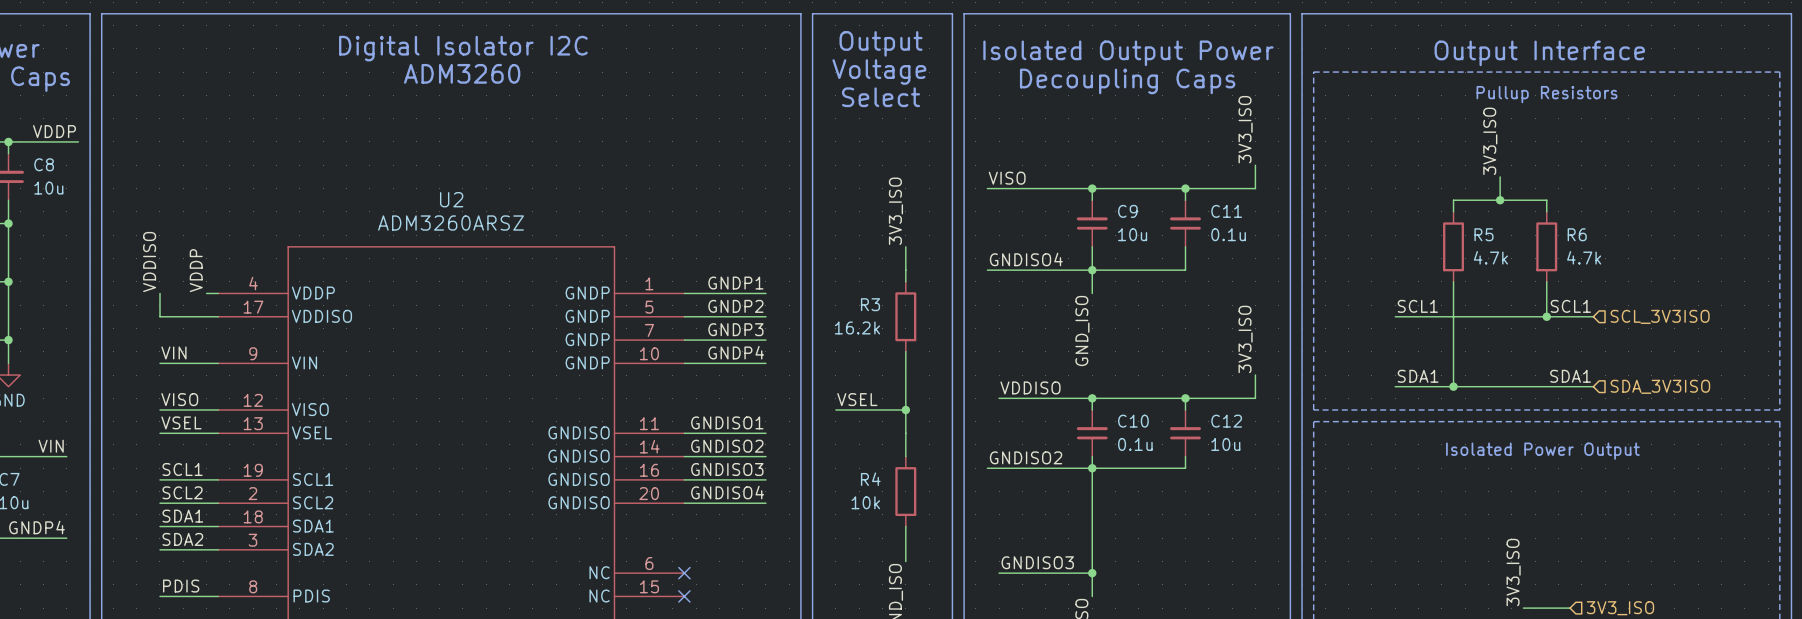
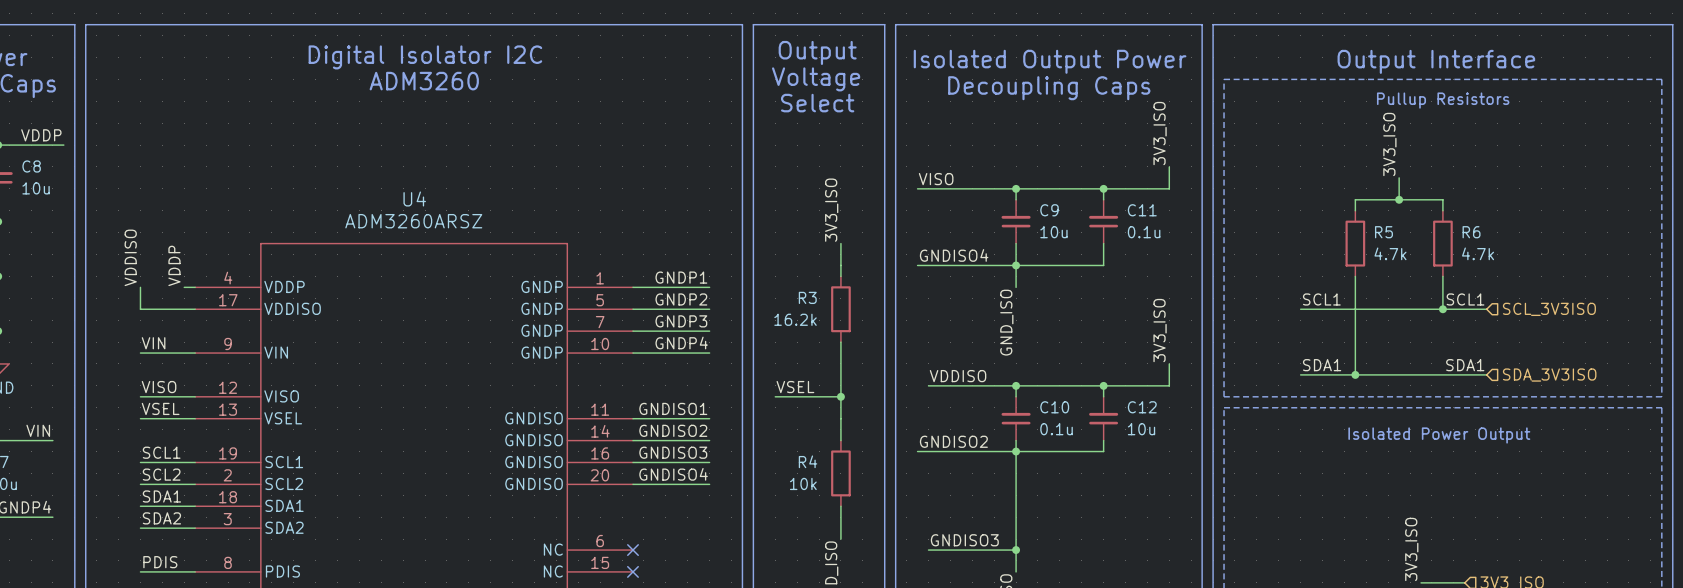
U2 name: U2 (451, 199) -> U4 (414, 199)

